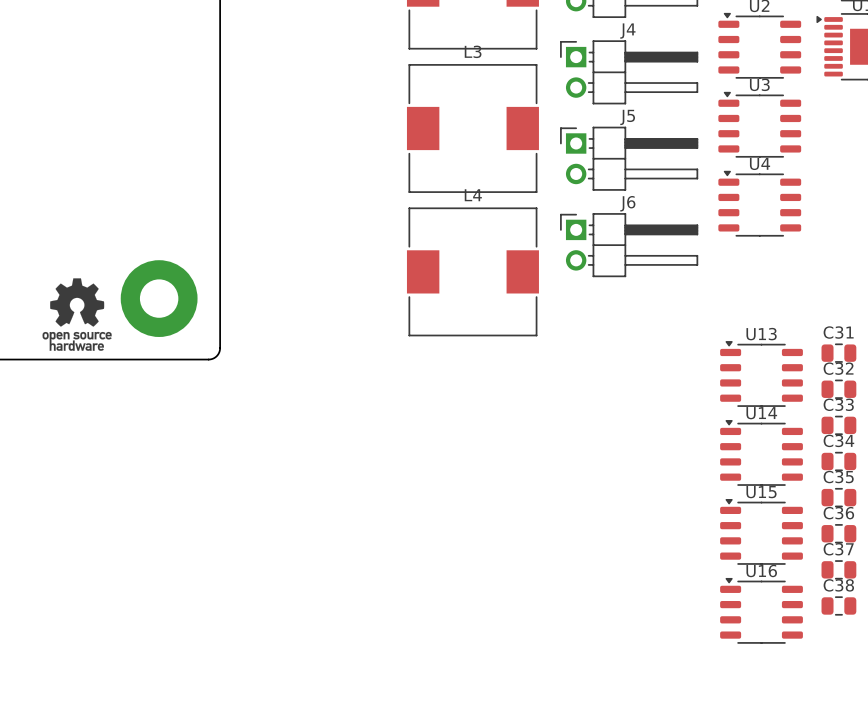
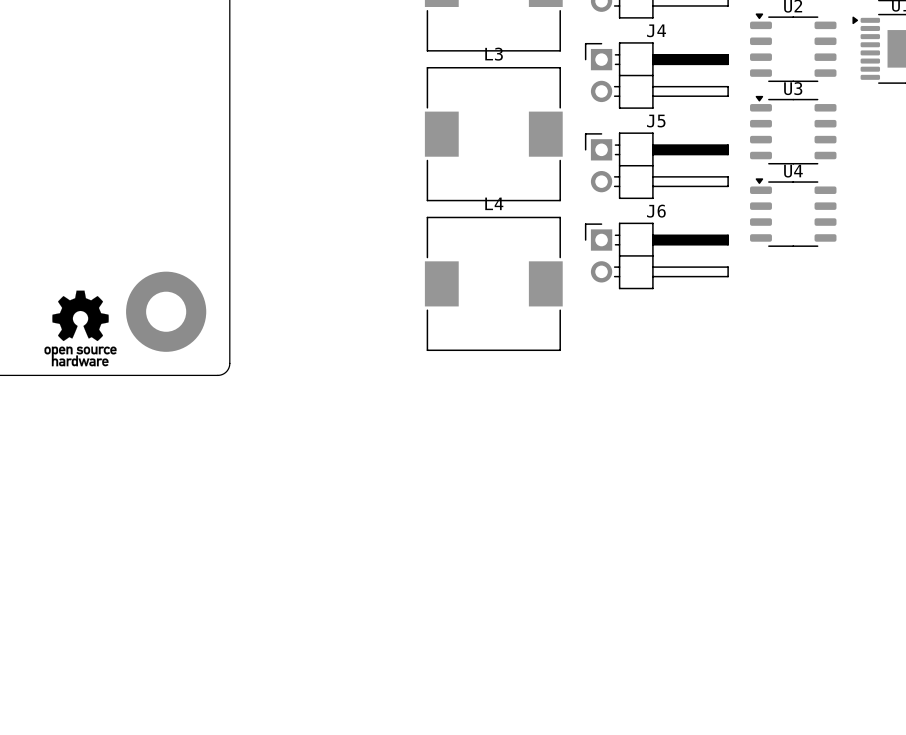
C31: (838, 353) -> none
U13: (761, 373) -> none
C32: (838, 389) -> none
C33: (838, 425) -> none
U14: (761, 452) -> none
C34: (838, 461) -> none
C35: (838, 497) -> none
U15: (761, 531) -> none
C36: (838, 533) -> none
C37: (838, 569) -> none
C38: (838, 605) -> none
U16: (761, 610) -> none

